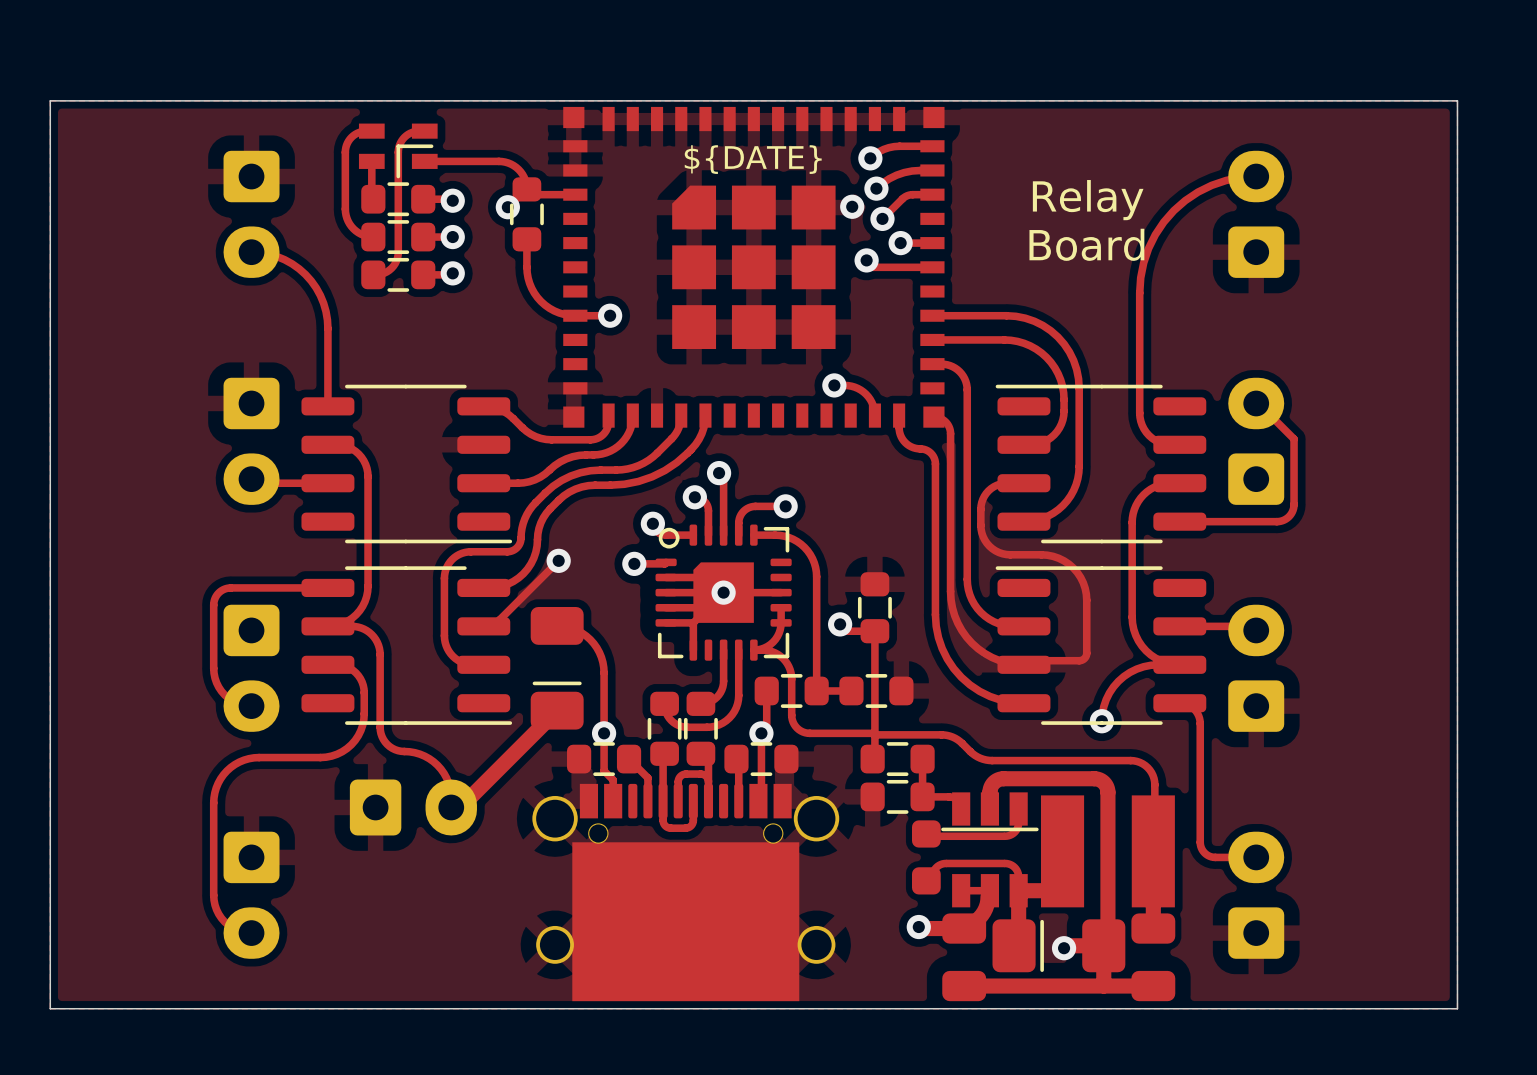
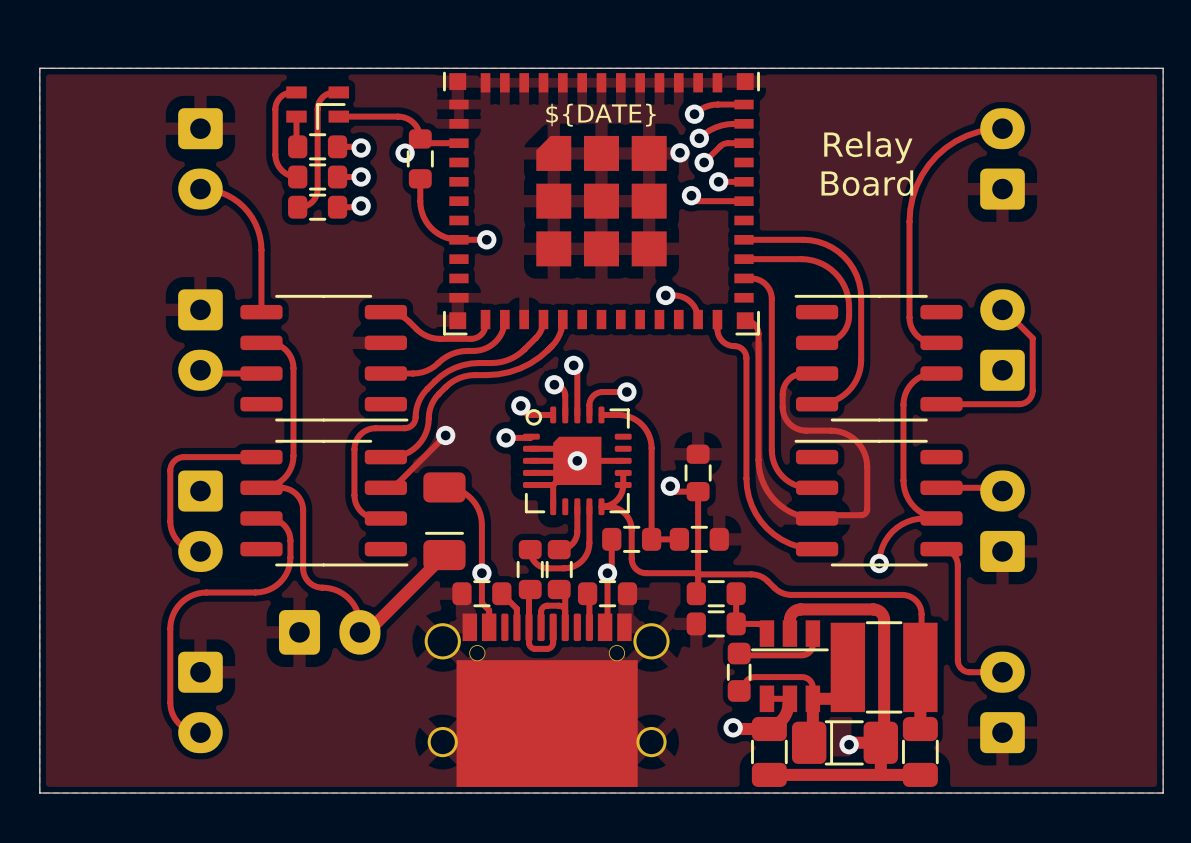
part footprint: [563, 106, 945, 428] -> [443, 71, 760, 336]
part footprint: [911, 771, 1176, 1002] -> [726, 603, 939, 787]

